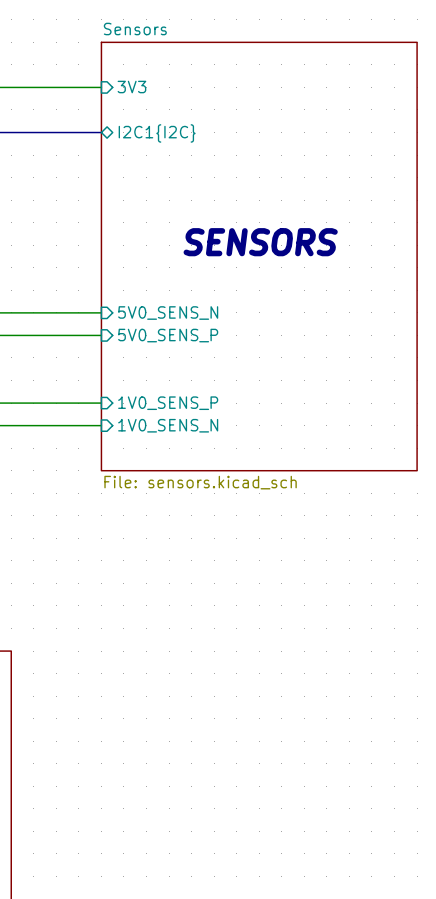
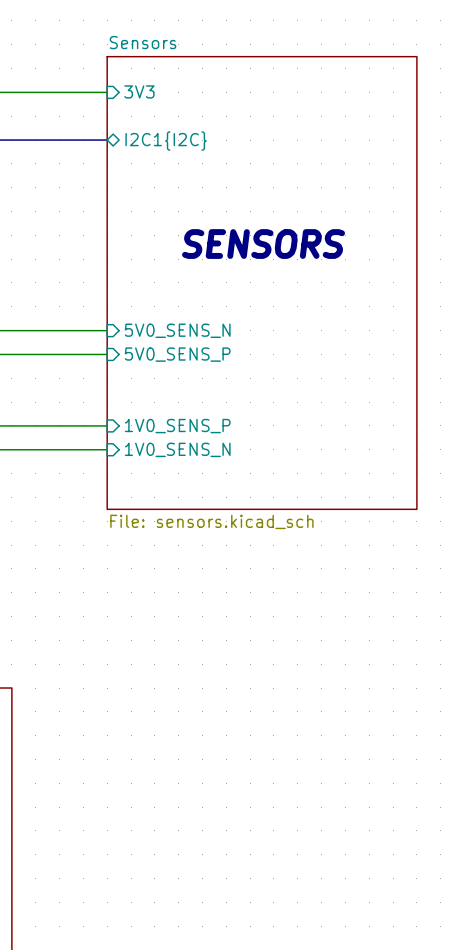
text position: SENSORS (260, 242) -> SENSORS (263, 244)
sheet Sensors: File: sensors.kicad_sch (259, 256) -> none
sheet Sensors: none -> File: sensors.kicad_sch (262, 282)

